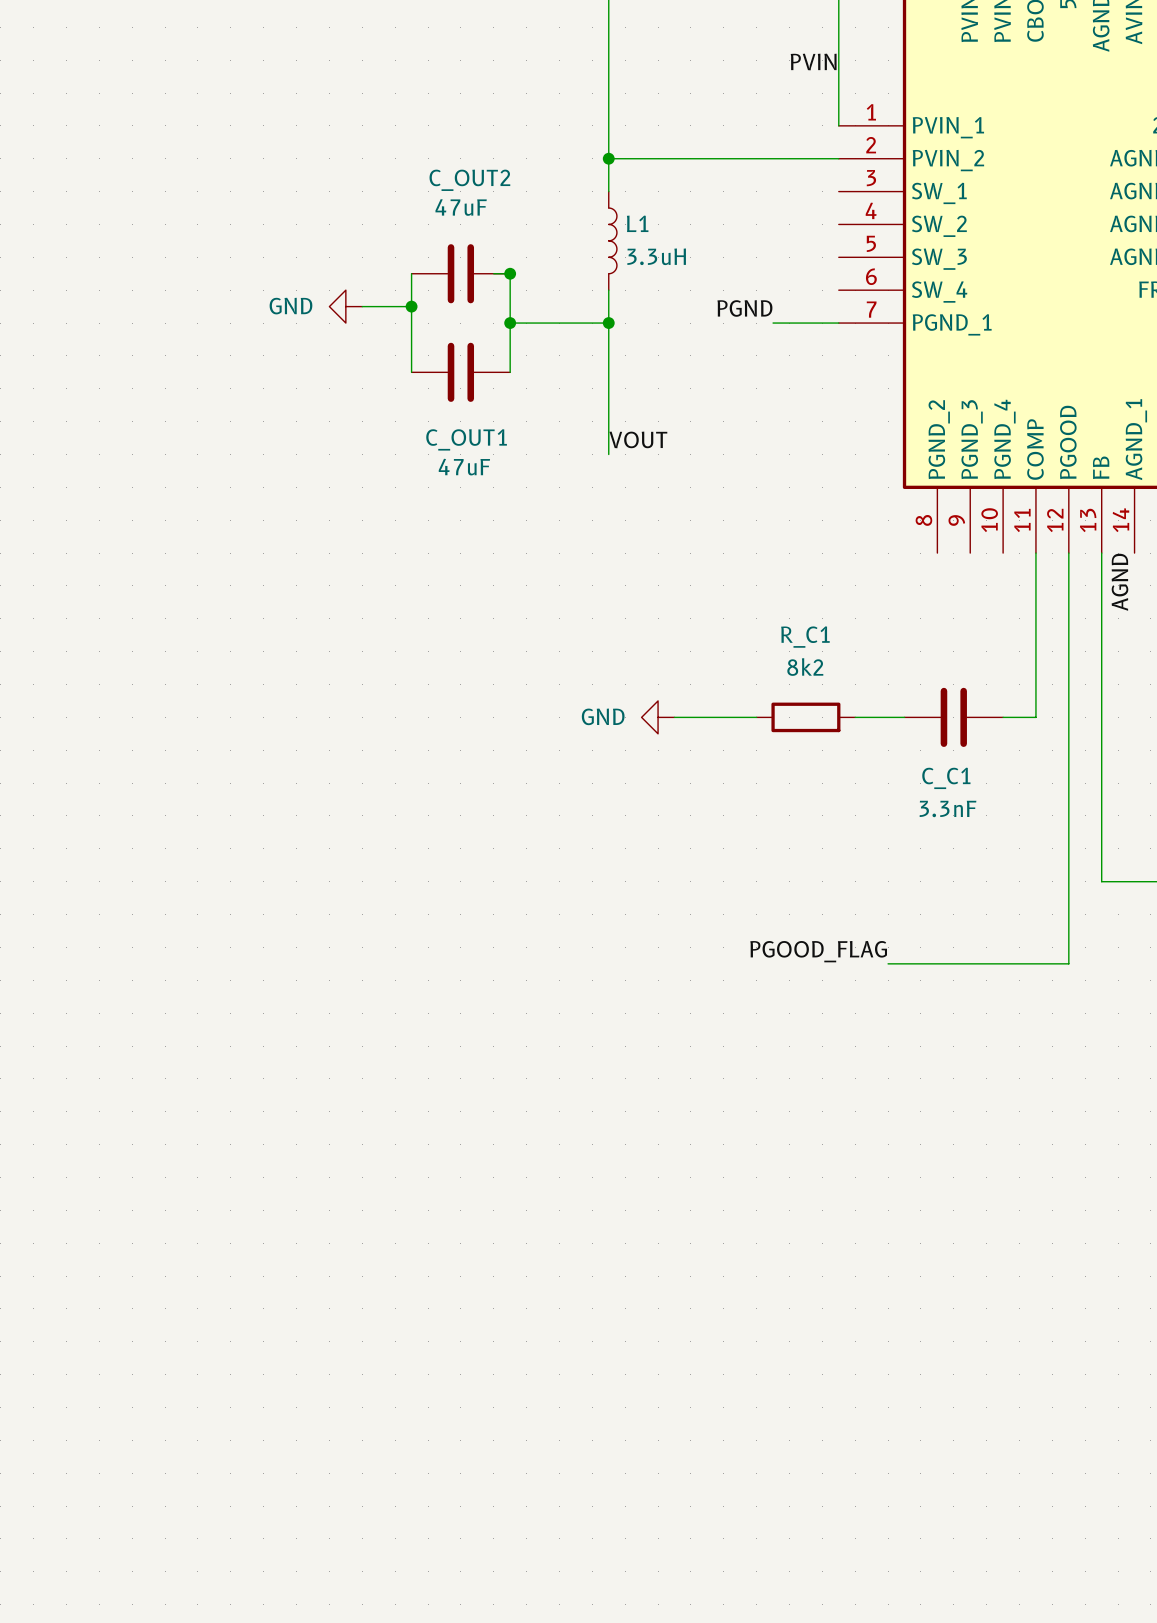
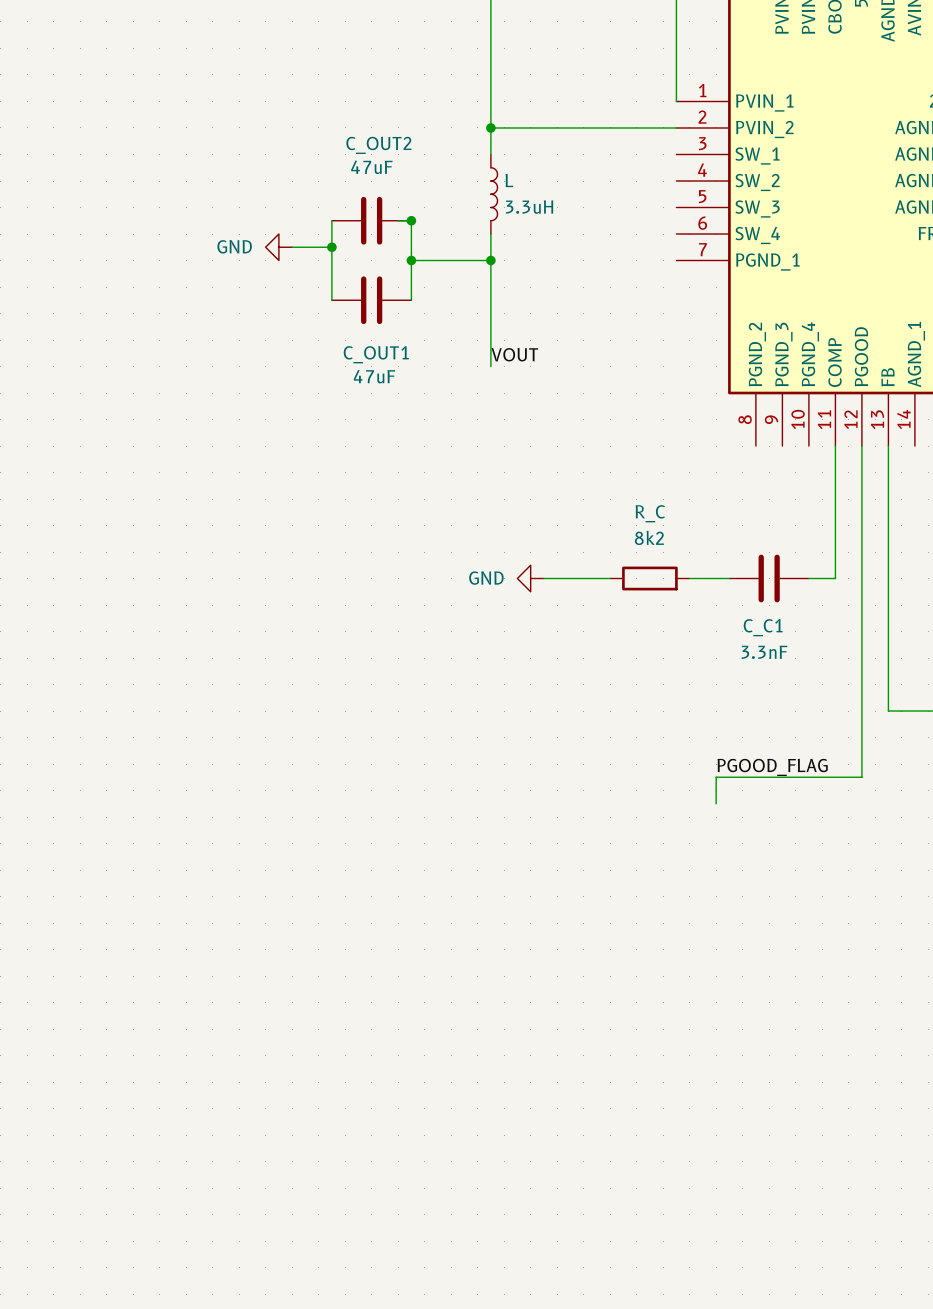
label: PVIN (813, 62) -> none
L1 name: L1 (637, 223) -> L (509, 180)
label: PGND (744, 308) -> none
wire: (773, 323) (838, 323) -> none
label: AGND (1119, 582) -> none
R_C1 name: R_C1 (805, 637) -> R_C (650, 513)
label position: PGOOD_FLAG (818, 951) -> PGOOD_FLAG (772, 767)
wire: none -> (716, 777) (716, 803)

